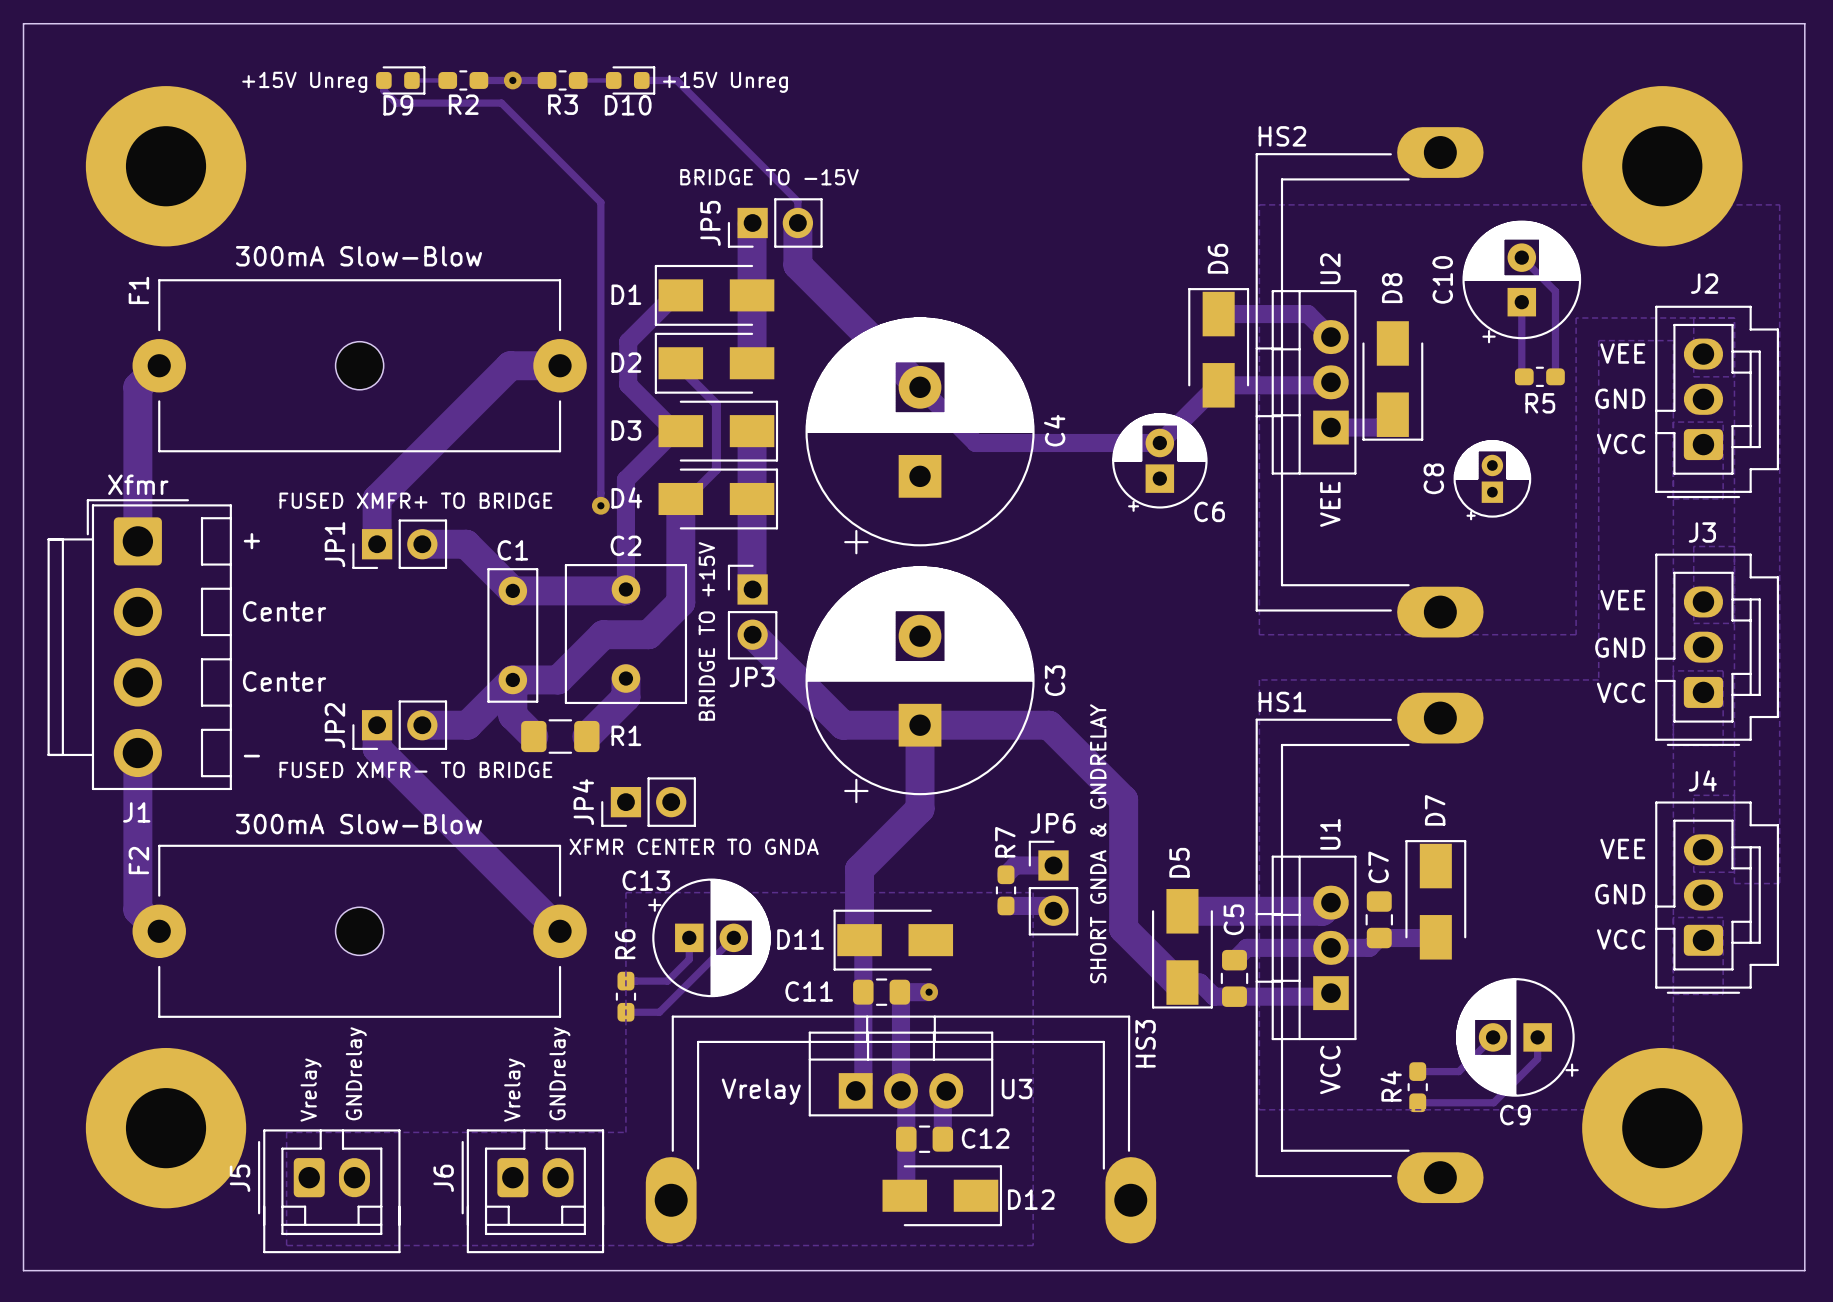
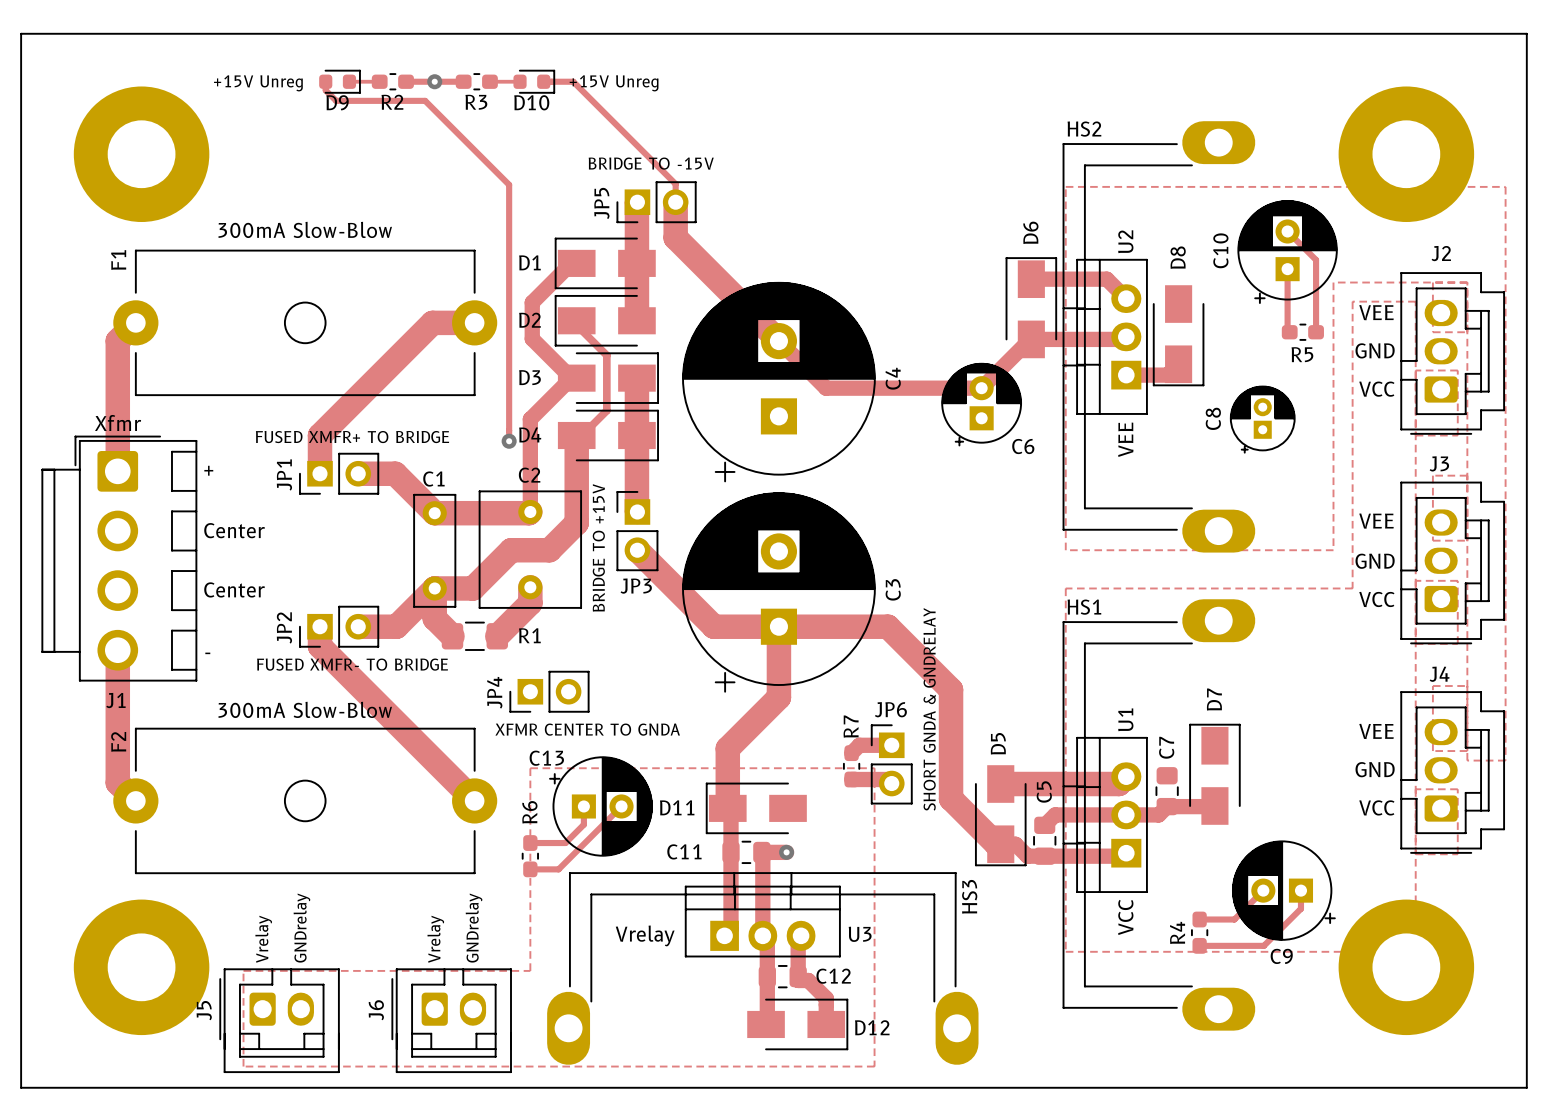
track: none -> (798, 976) (798, 980) (808, 980) (826, 998) (826, 1024)

